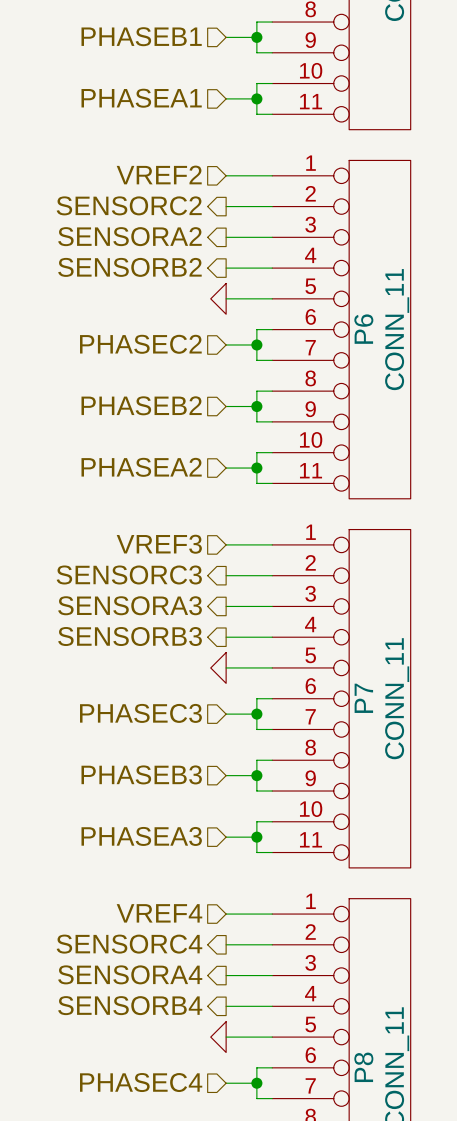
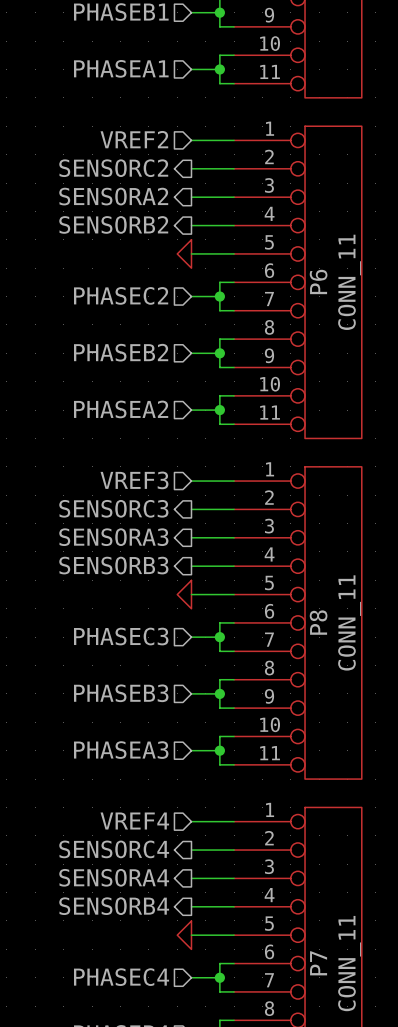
P7 name: P7 (363, 698) -> P8 (318, 622)
P8 name: P8 (363, 1067) -> P7 (318, 963)

